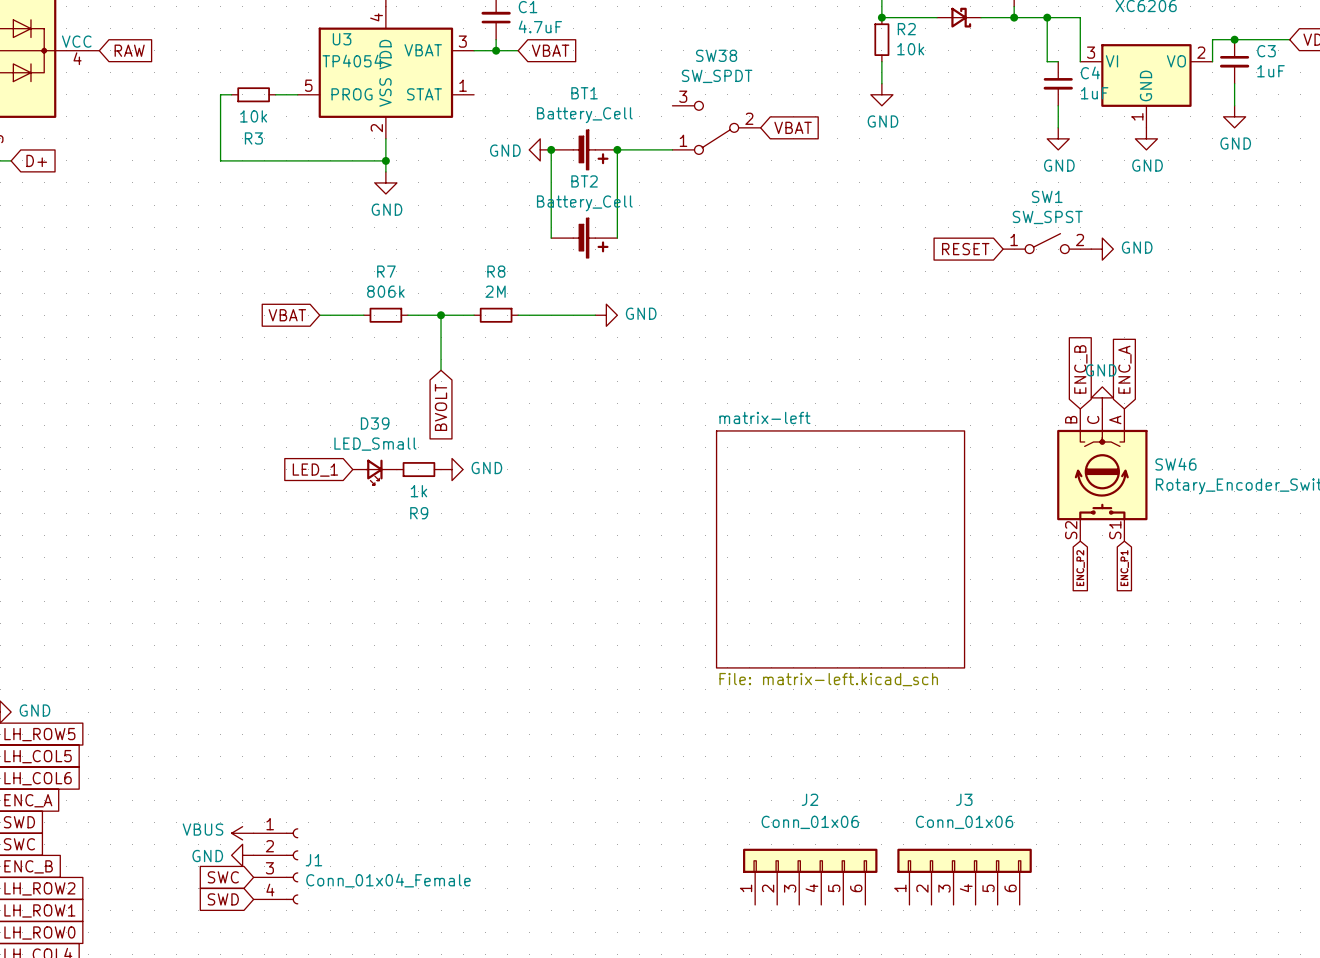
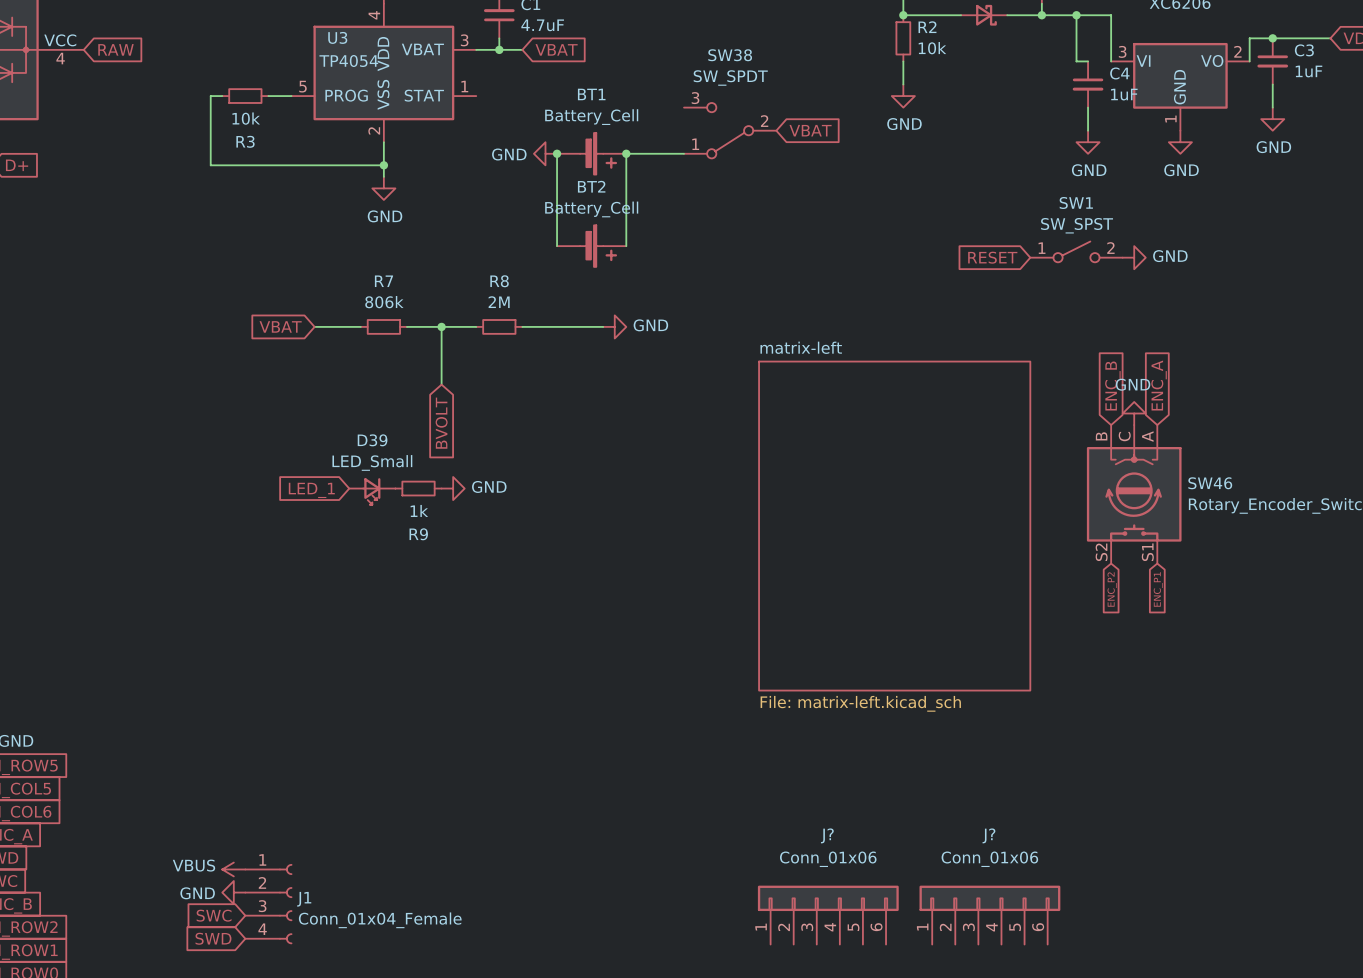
sheet matrix-left: none -> File: matrix-left.kicad_sch (894, 526)
sheet matrix-left: File: matrix-left.kicad_sch (840, 549) -> none
J2 name: J2 (809, 799) -> J? (827, 835)
J3 name: J3 (964, 799) -> J? (988, 835)

